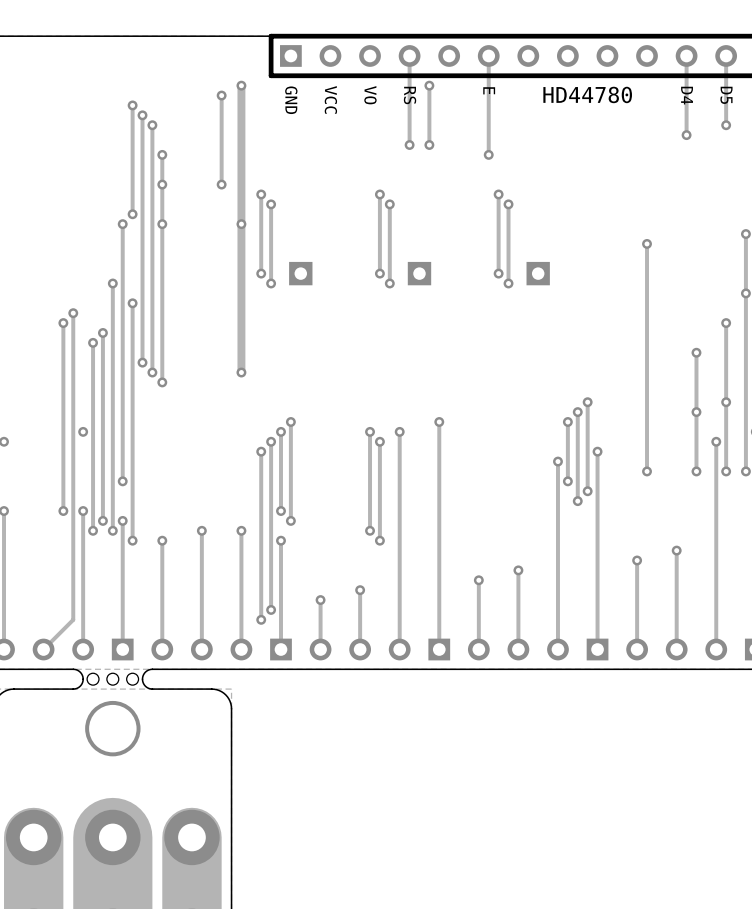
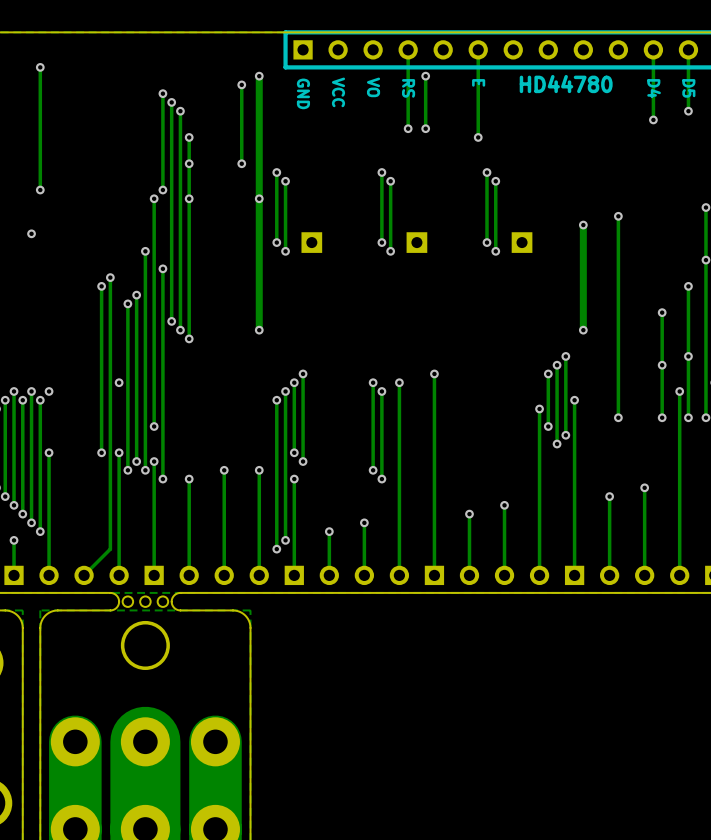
track: none -> (583, 225) (583, 330)
via: none -> (583, 225)
via: none -> (583, 330)

